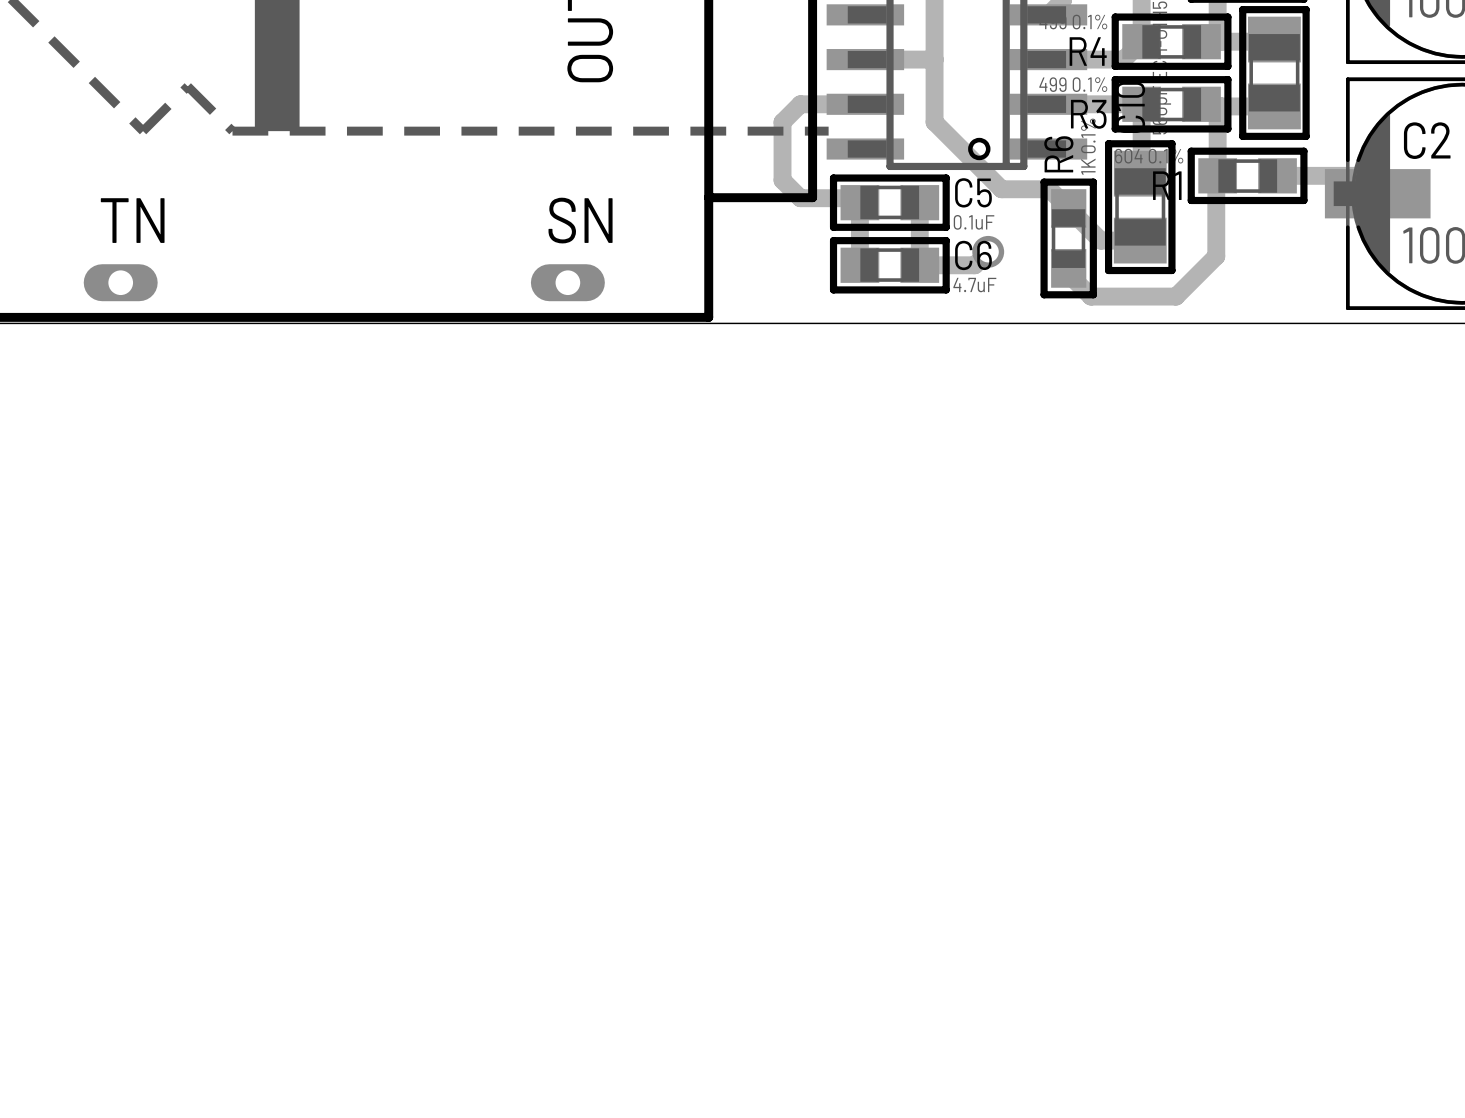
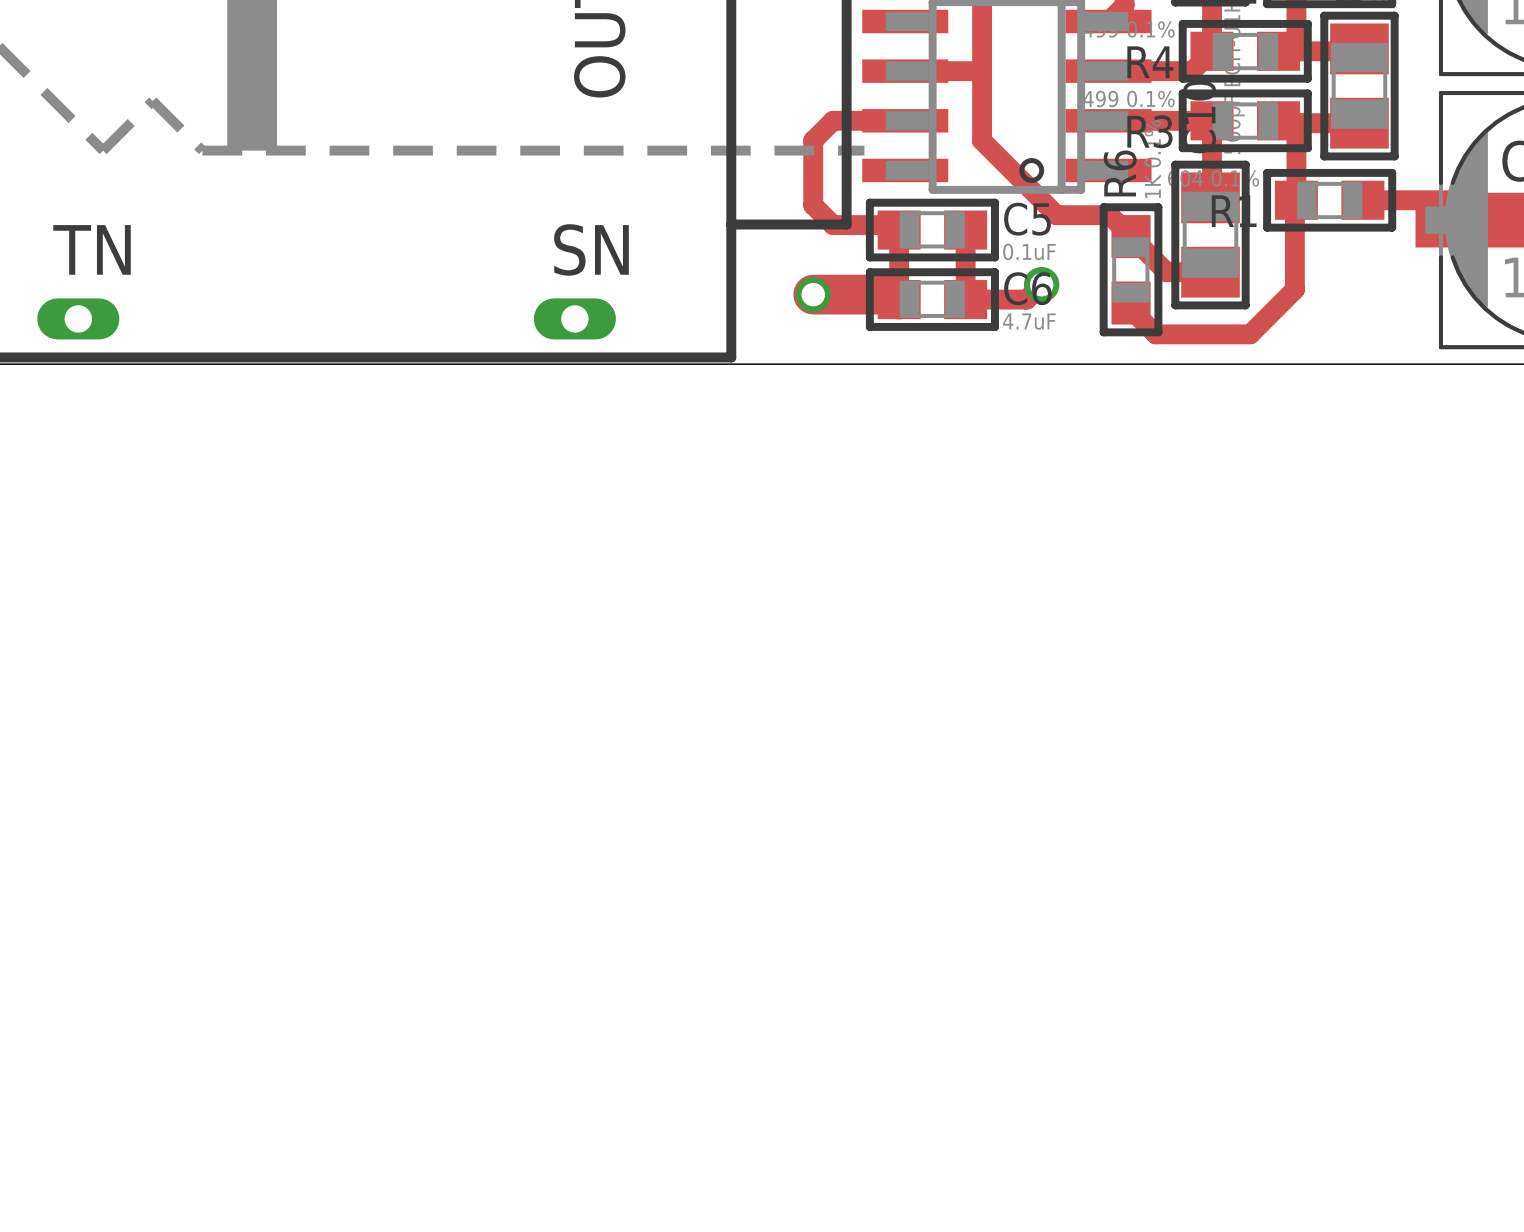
track: none -> (813, 294) (894, 294) (899, 299)
via: none -> (813, 294)

